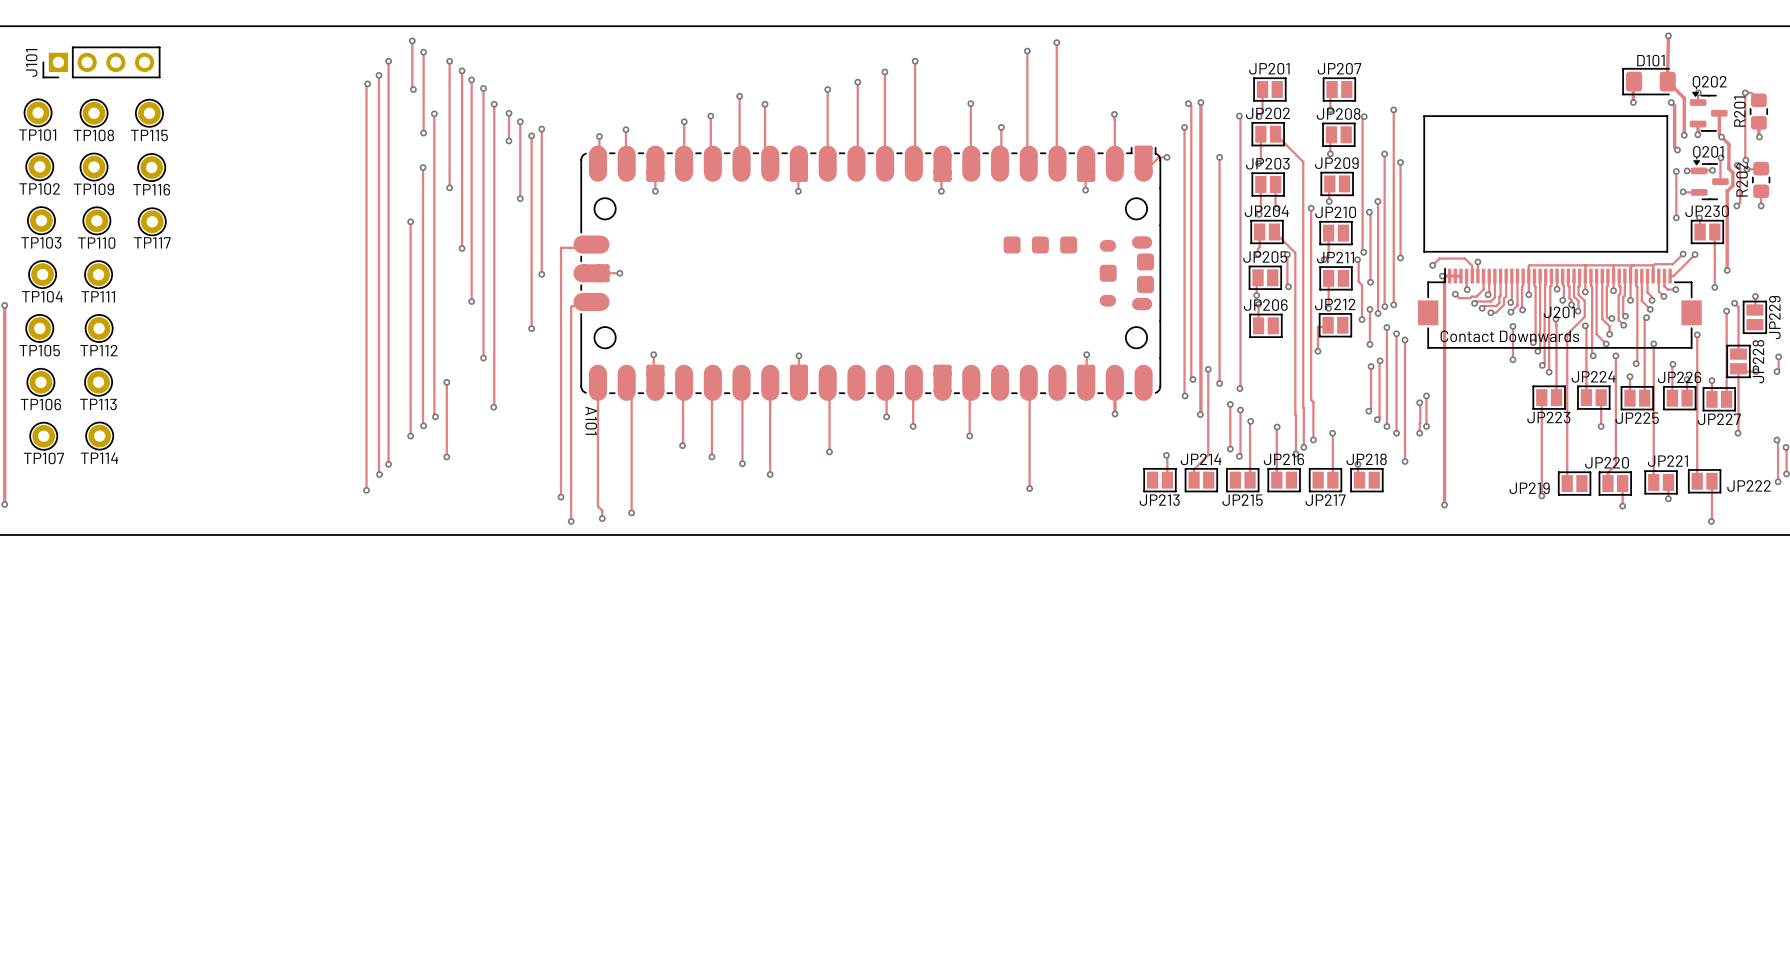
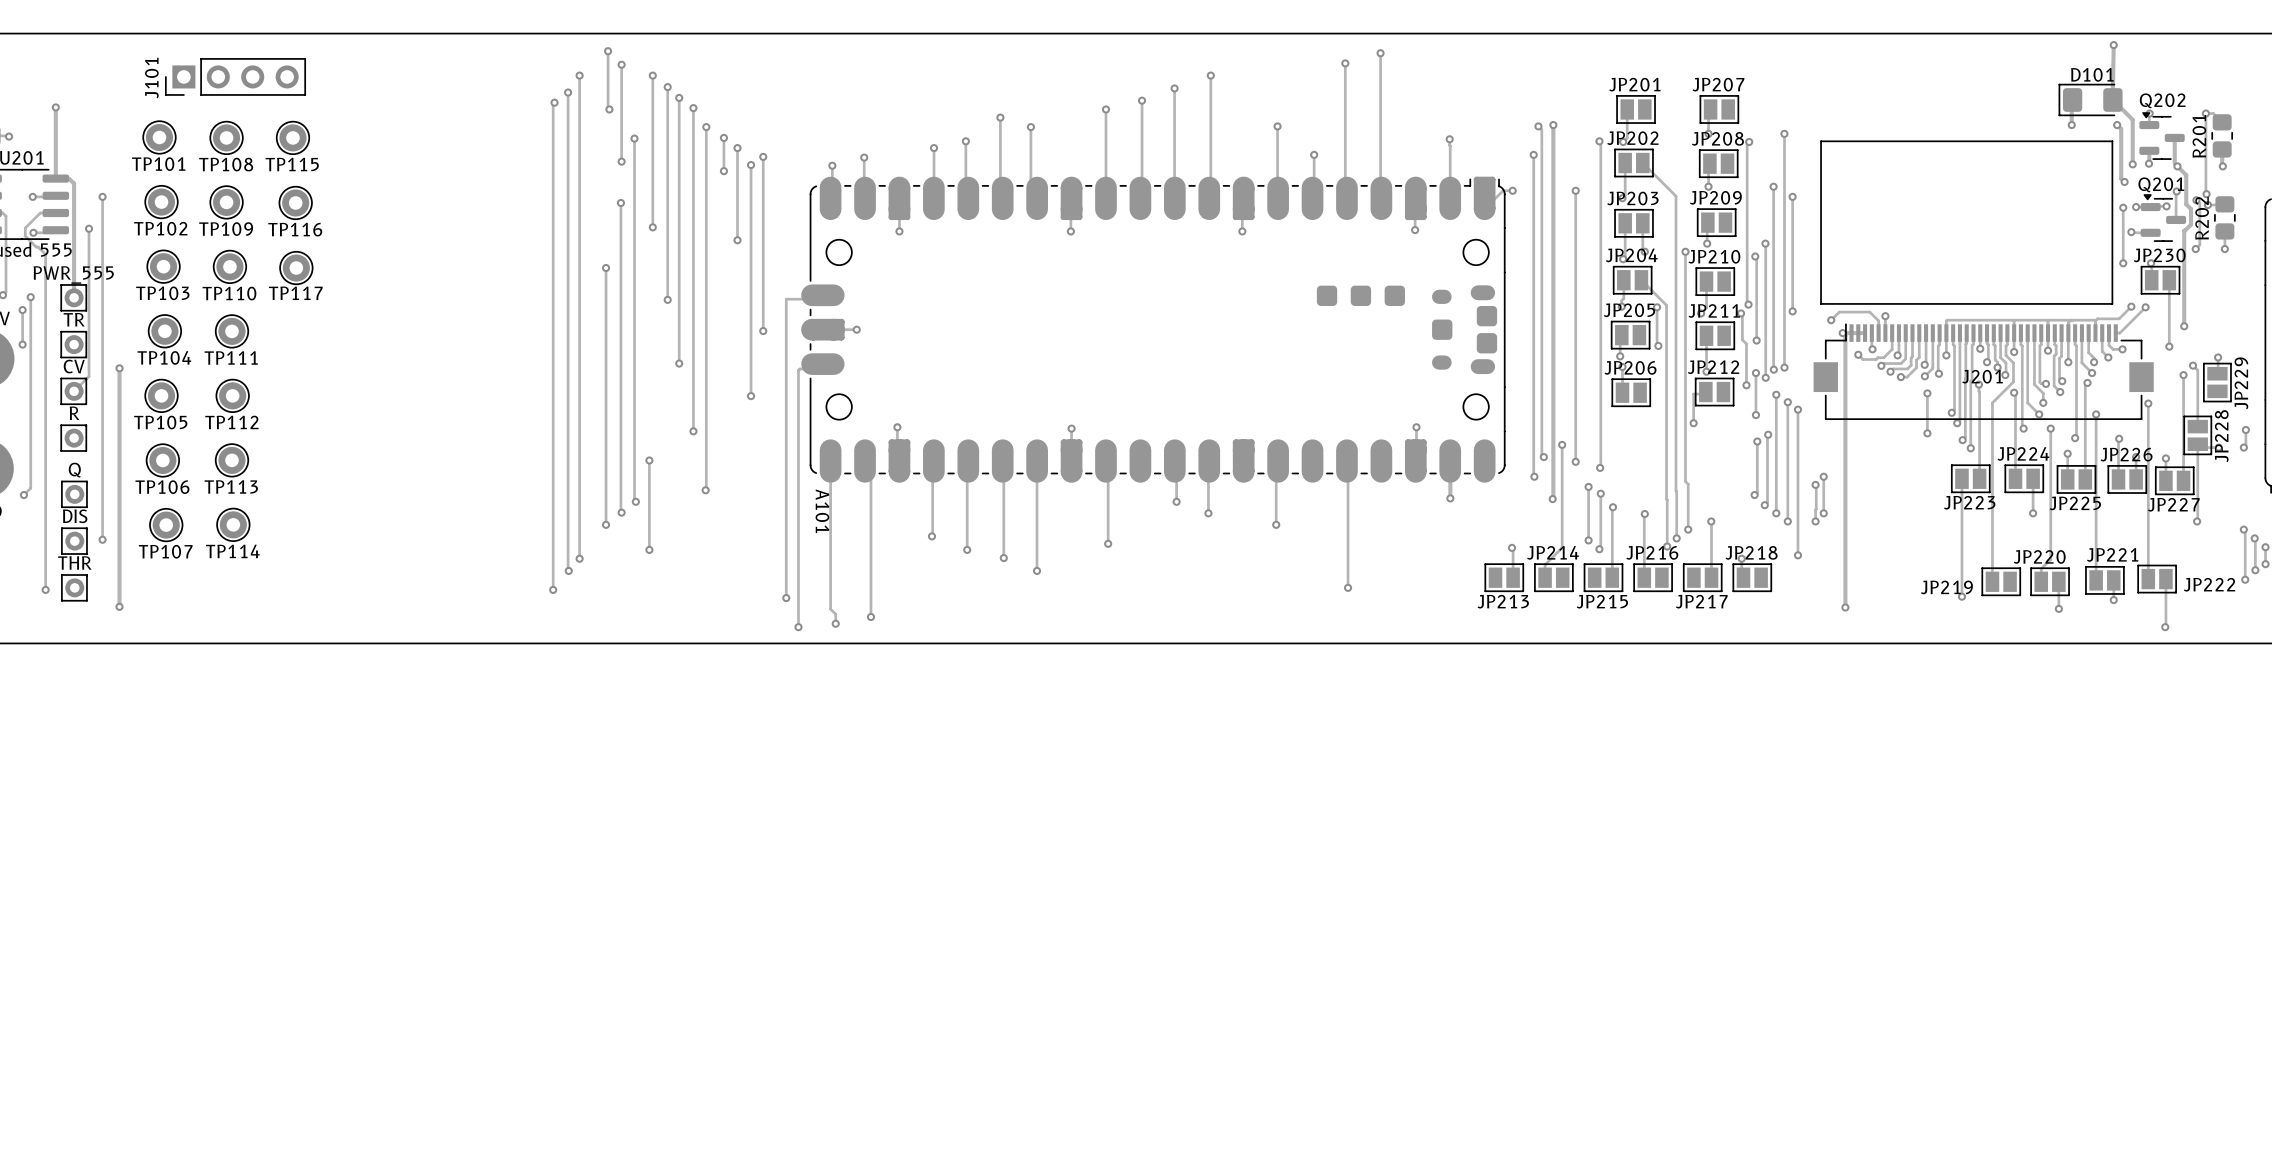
text: Contact Downwards (1509, 336) -> none

